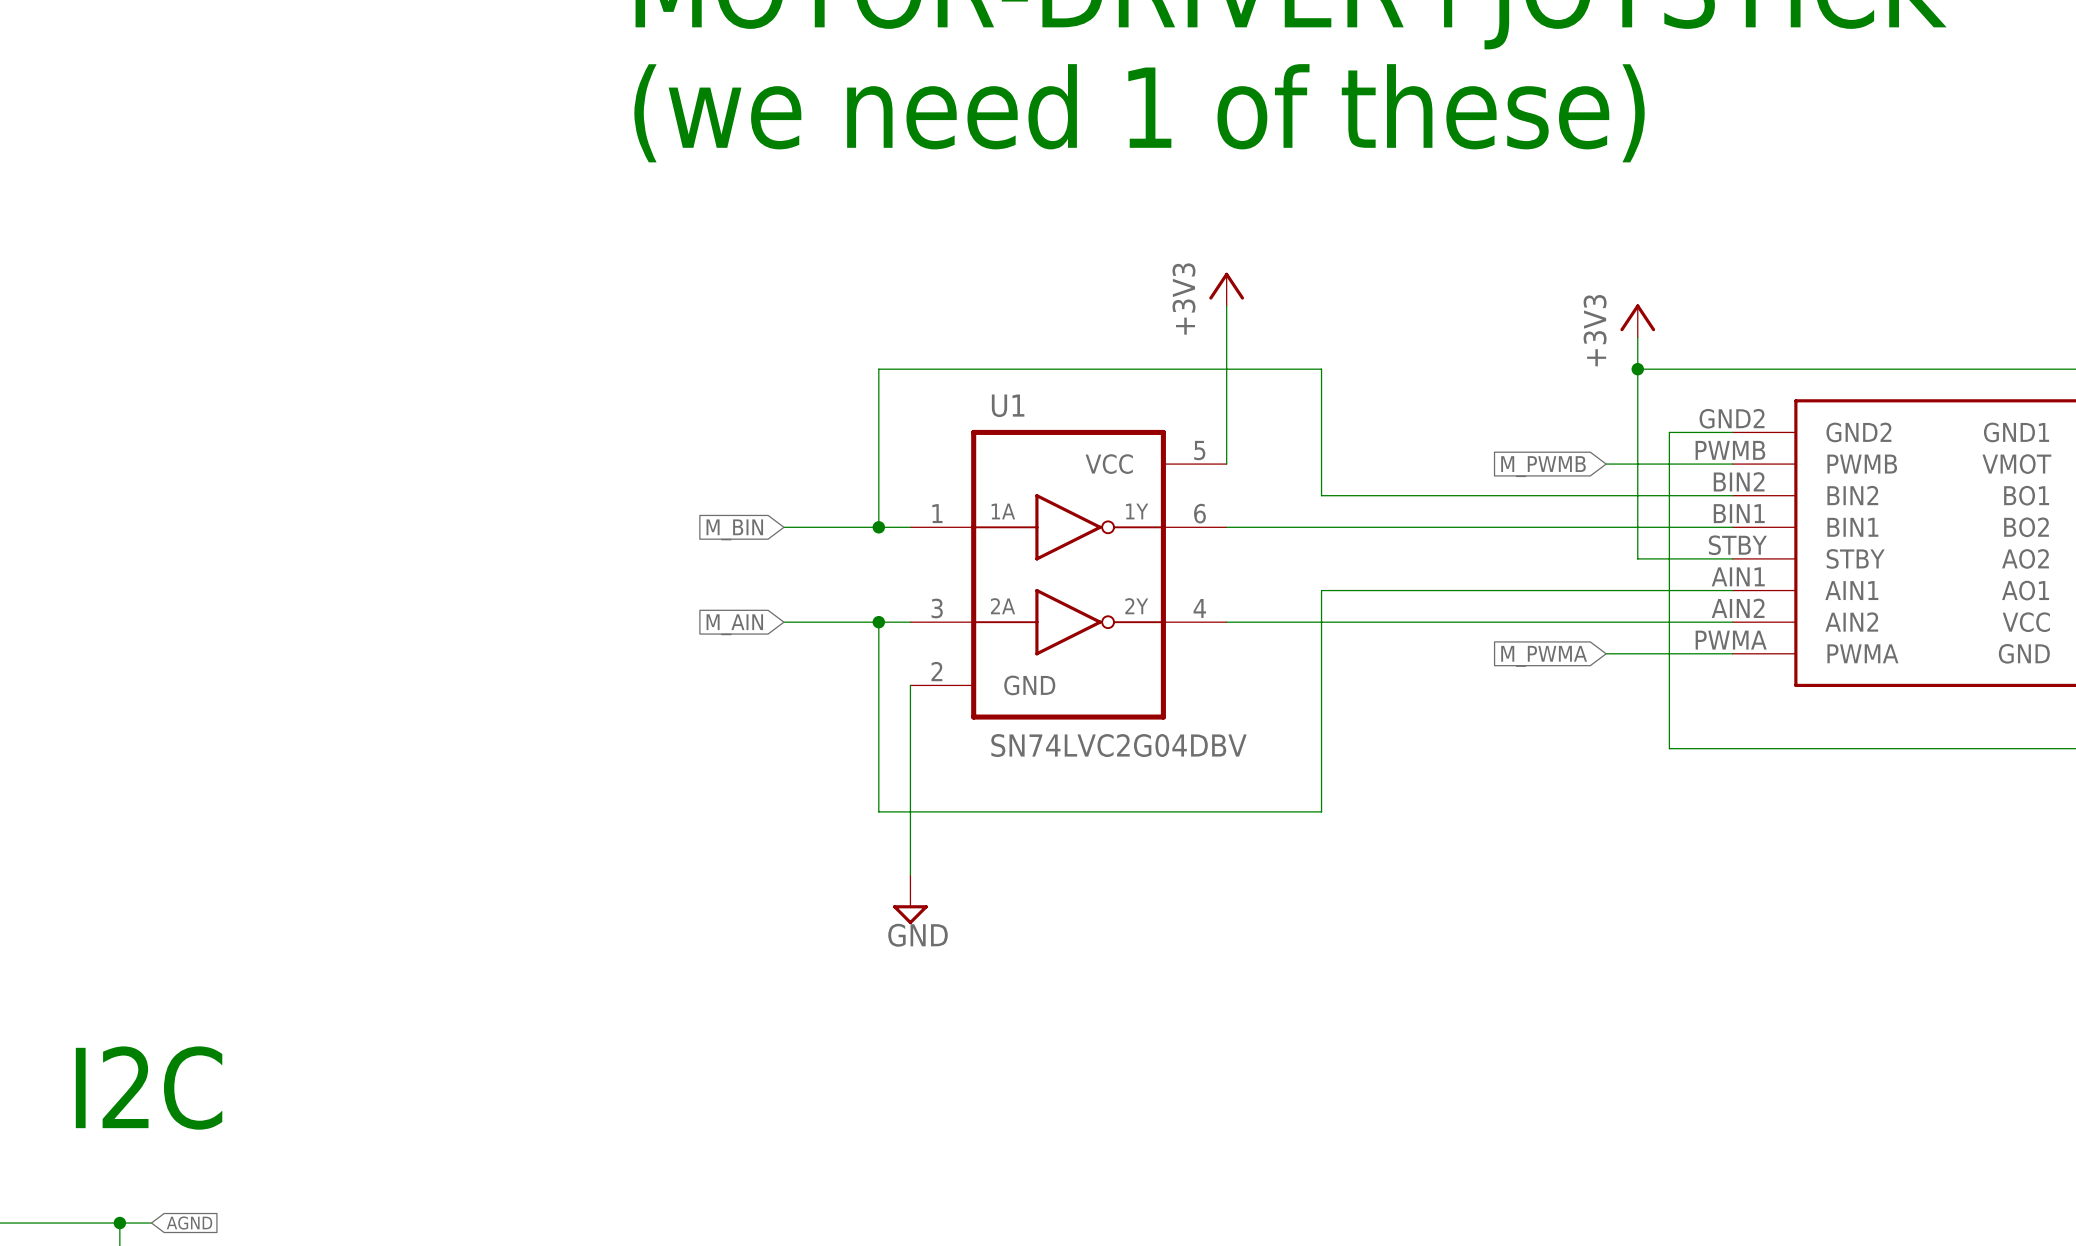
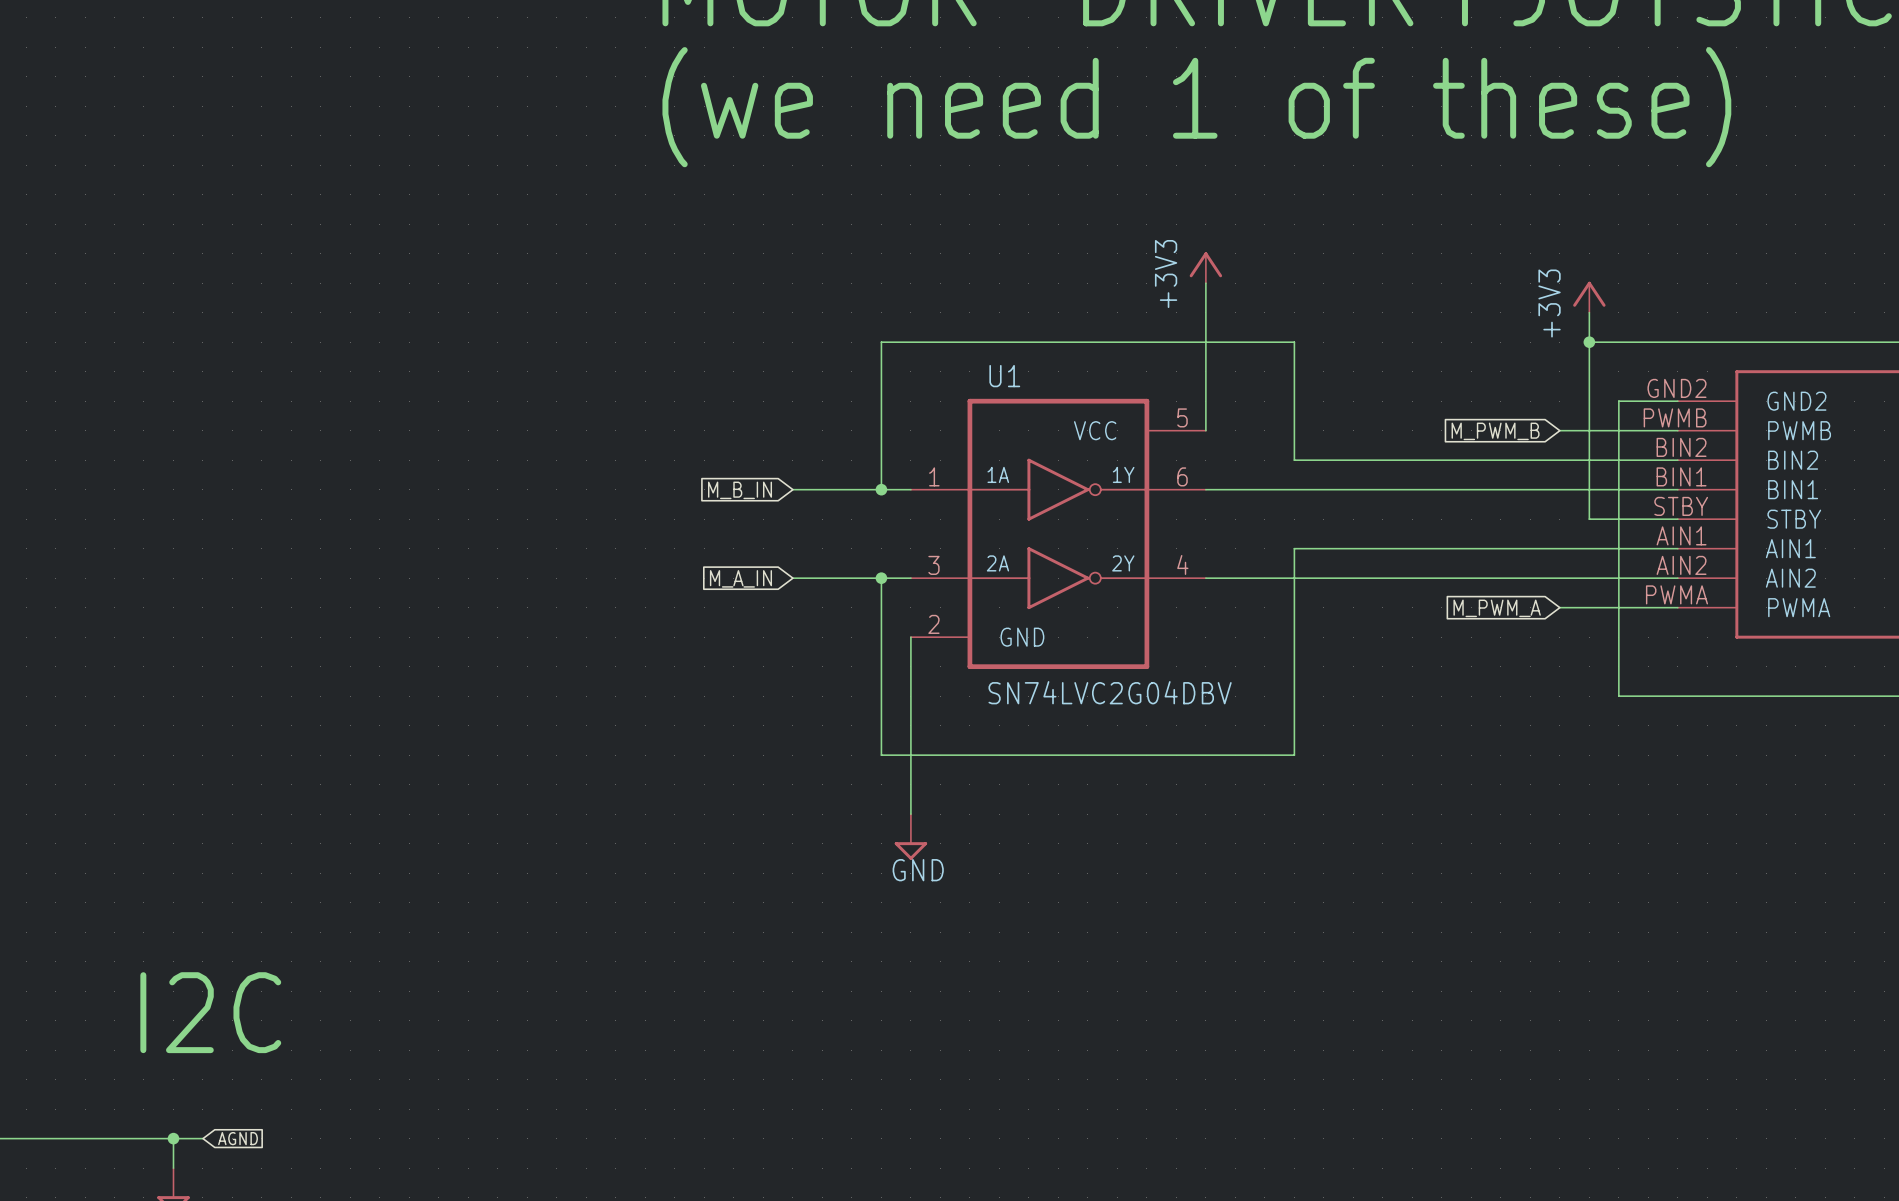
global label: M_PWMB (1543, 466) -> M_PWM_B (1495, 431)
global label: M_BIN (734, 529) -> M_B_IN (740, 490)
global label: M_AIN (734, 624) -> M_A_IN (740, 578)
global label: M_PWMA (1544, 656) -> M_PWM_A (1497, 608)

